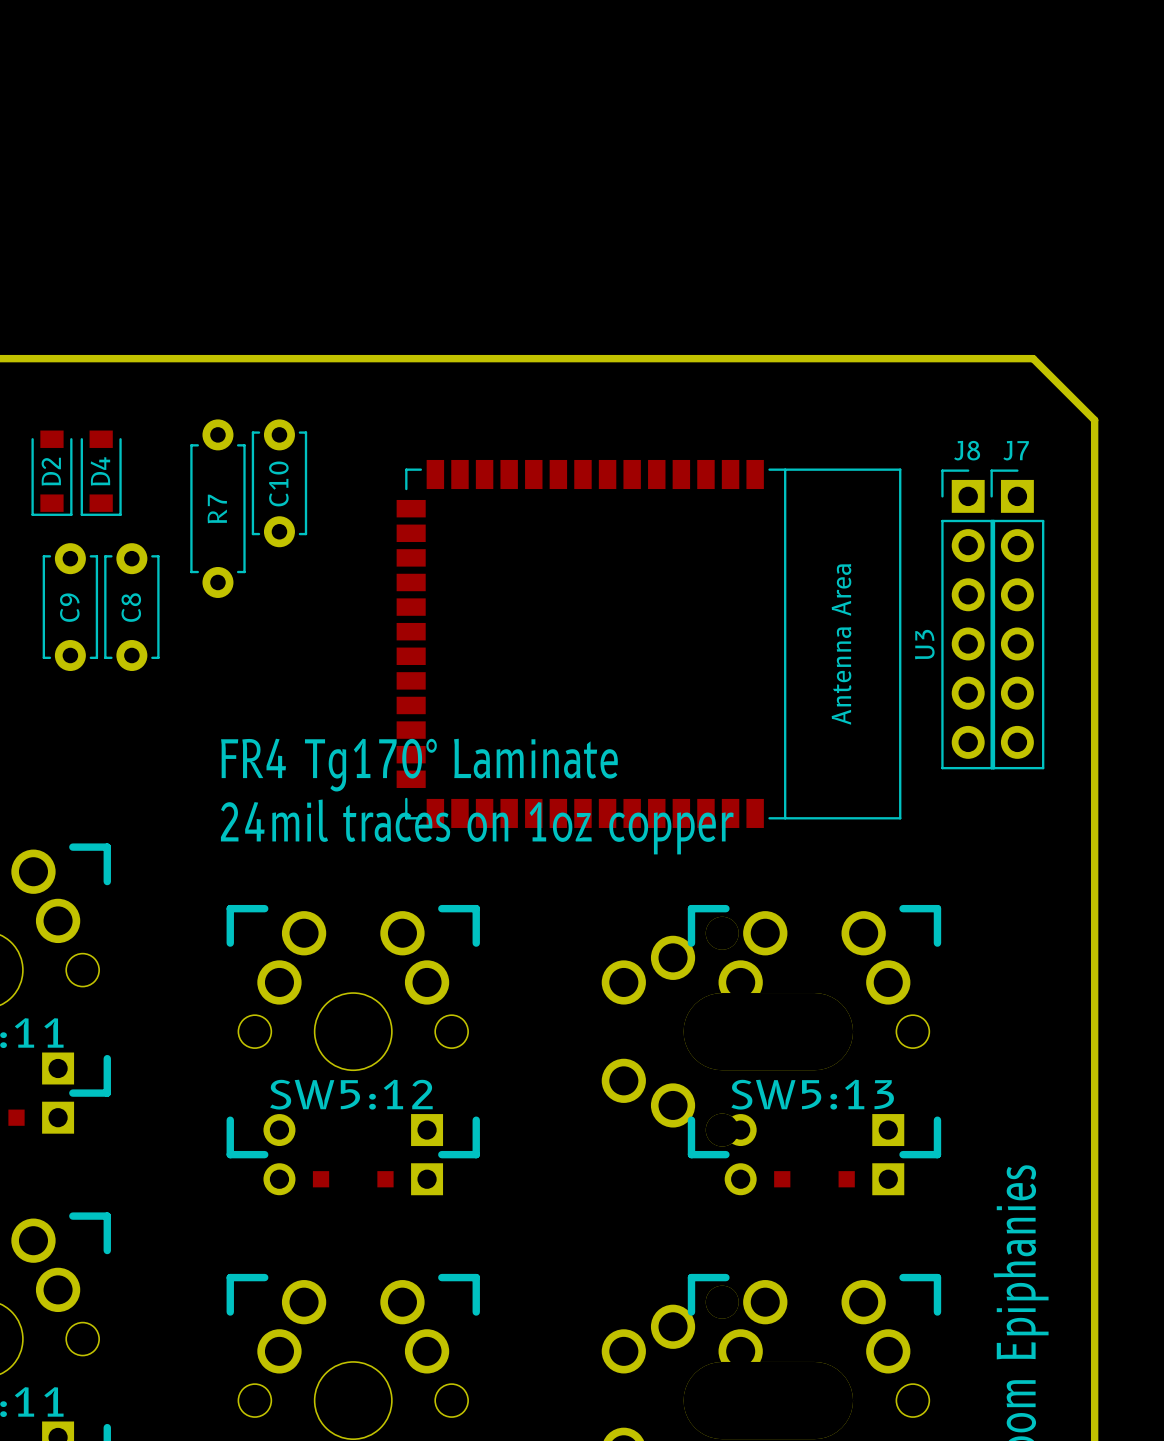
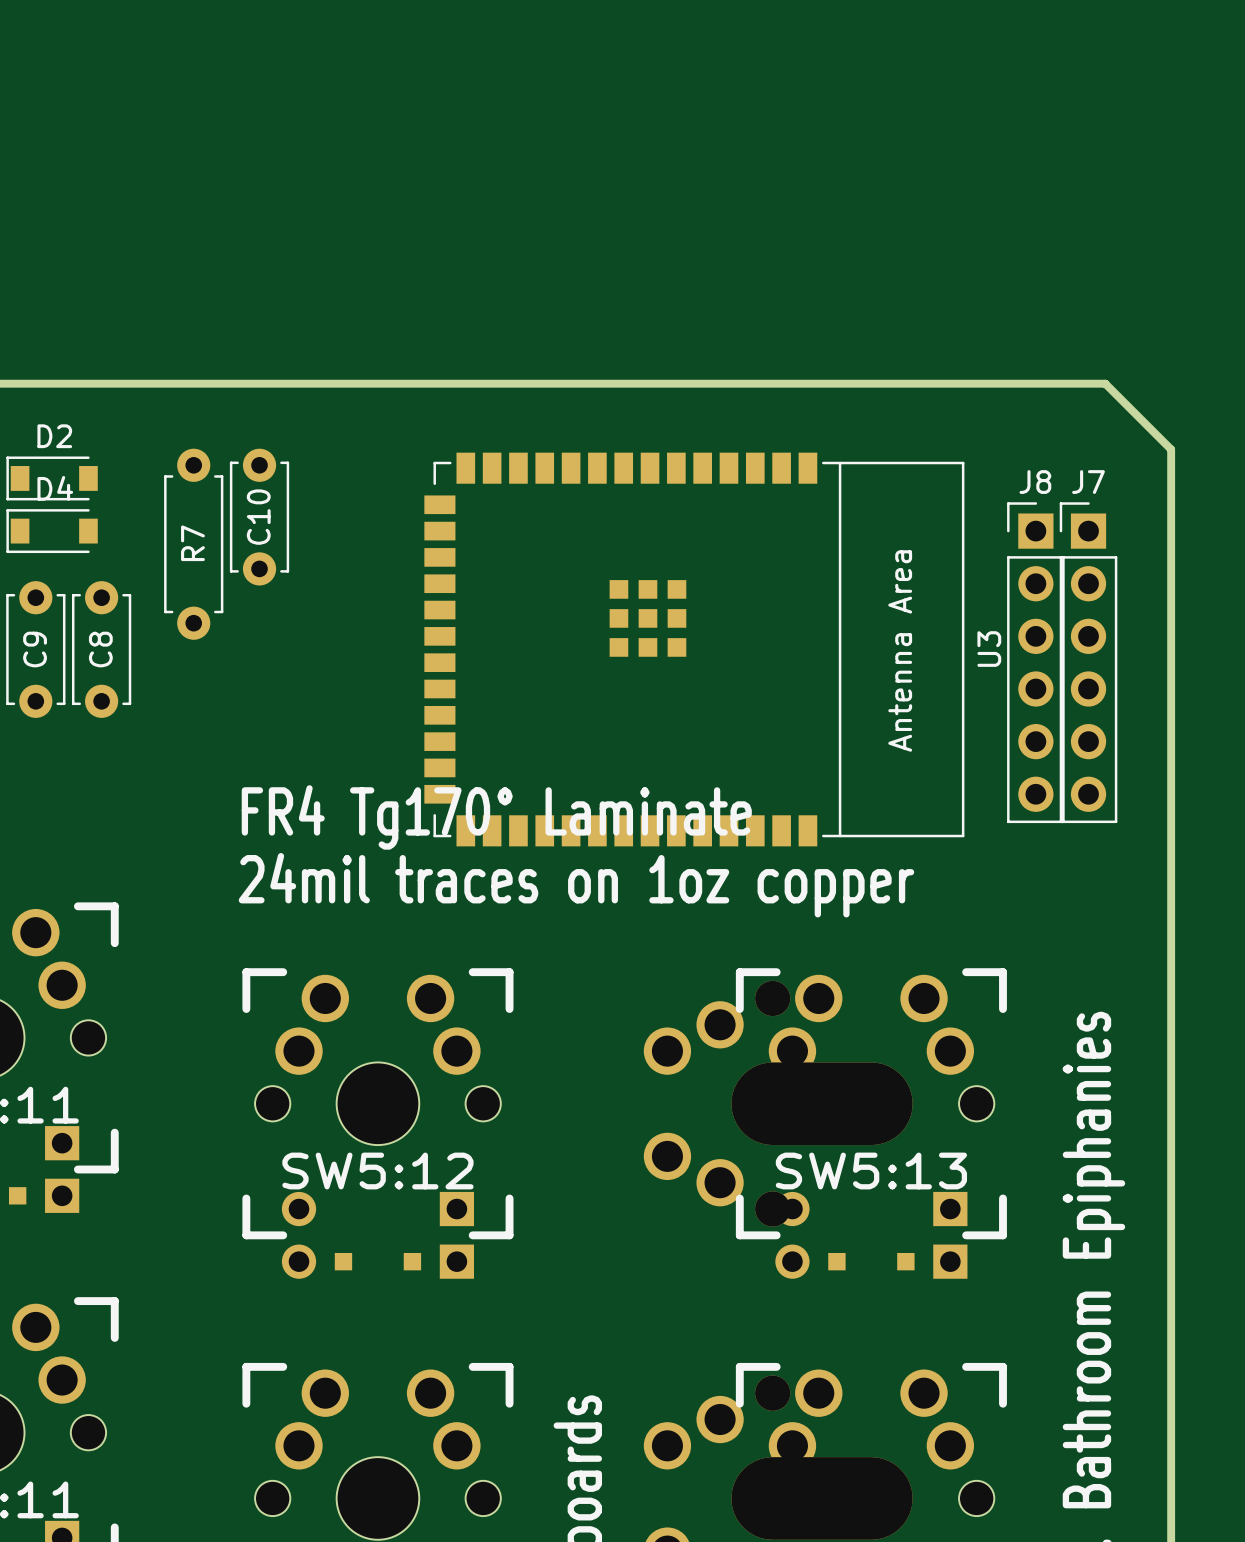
U3 footprint: [396, 459, 902, 828] -> [424, 452, 965, 847]
D2 rotation: 0° (51, 473) -> 90° clockwise (52, 478)
D4 rotation: 0° (101, 473) -> 90° clockwise (52, 531)
D4 position: (101, 473) -> (52, 531)
C10 position: (279, 483) -> (259, 517)
R7 position: (217, 508) -> (193, 544)
C9 position: (70, 607) -> (35, 649)
C8 position: (131, 607) -> (101, 649)

